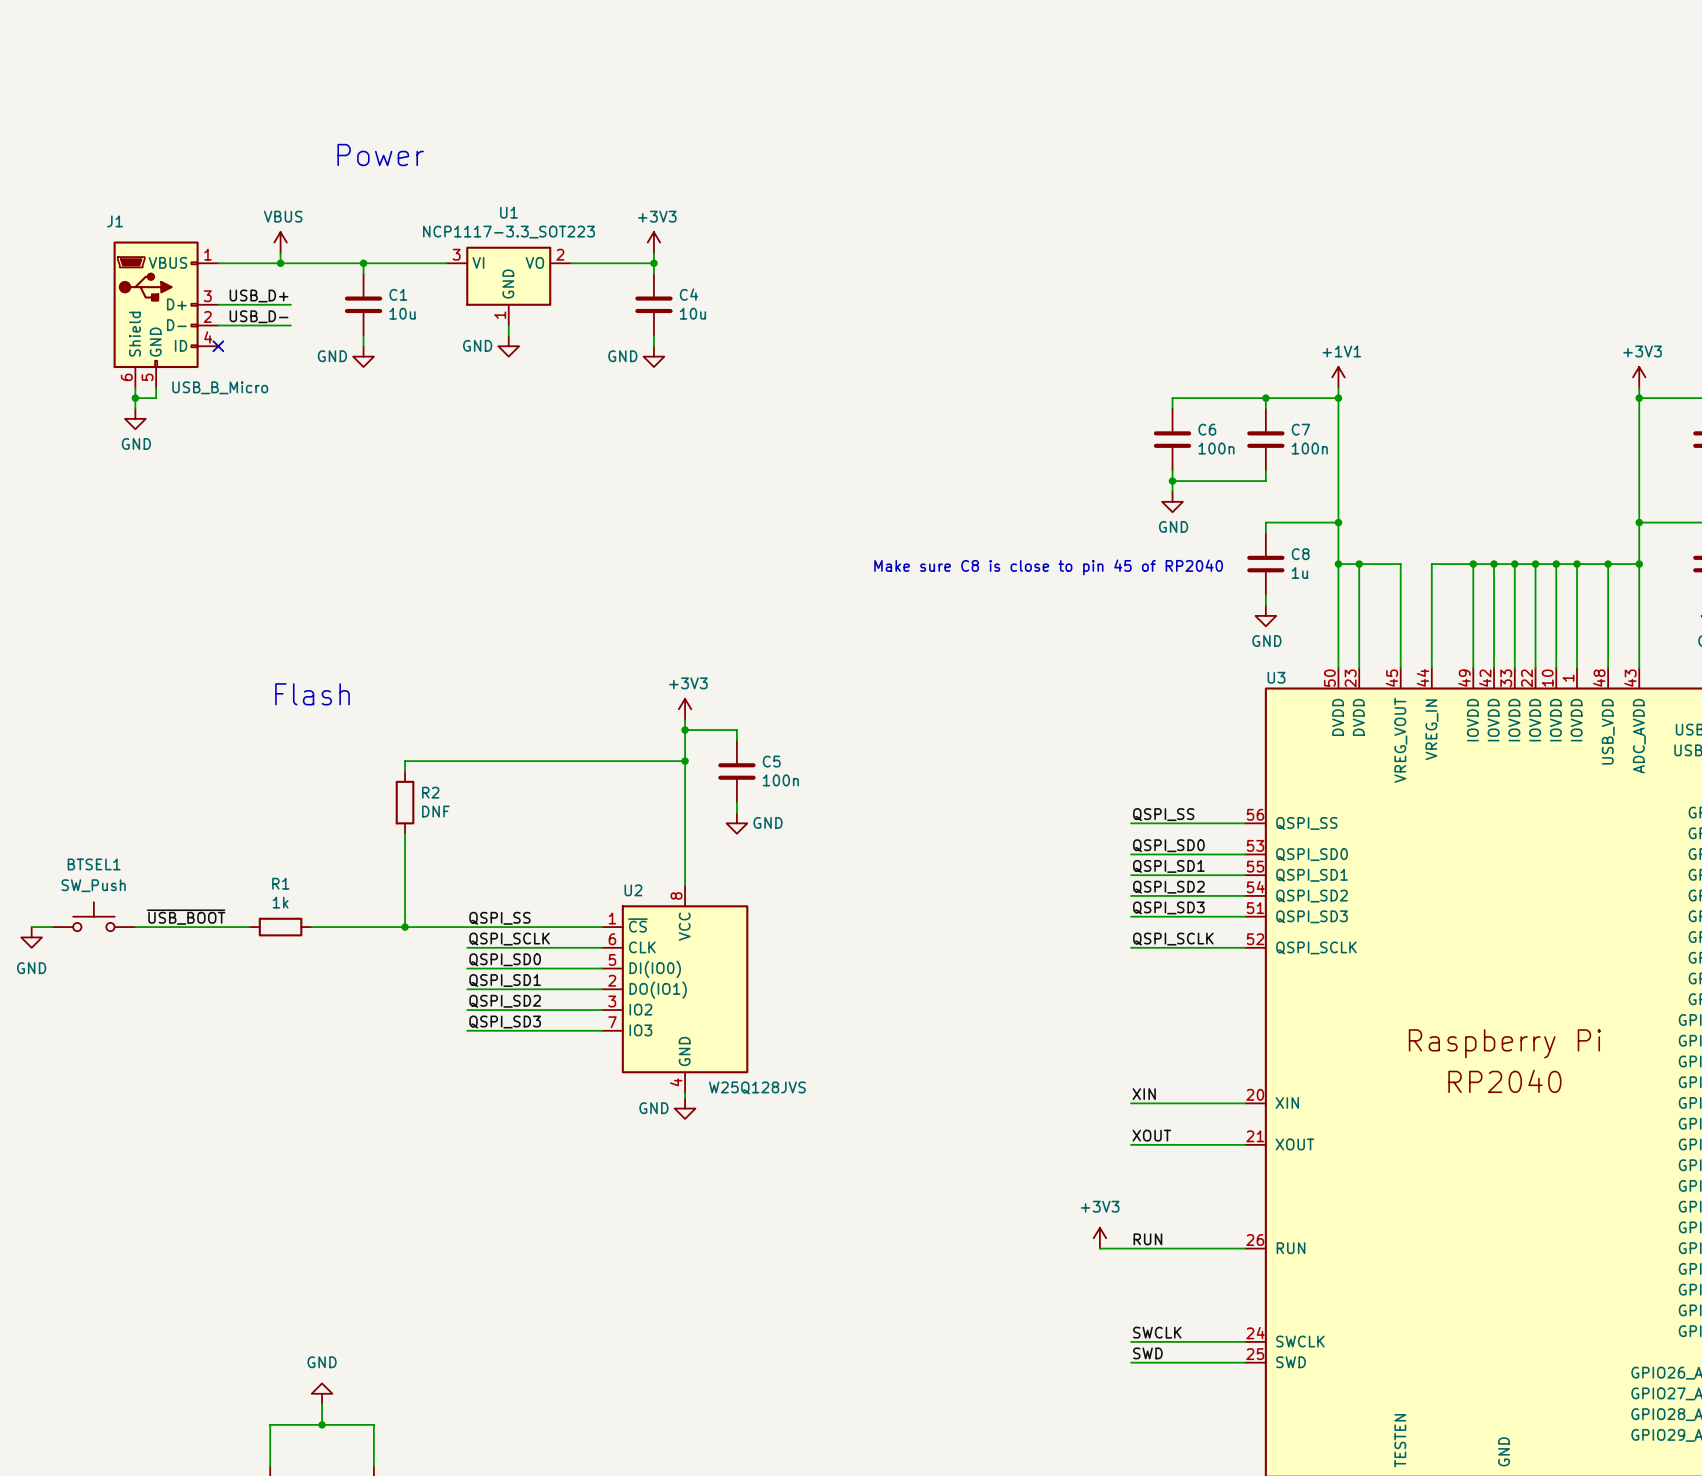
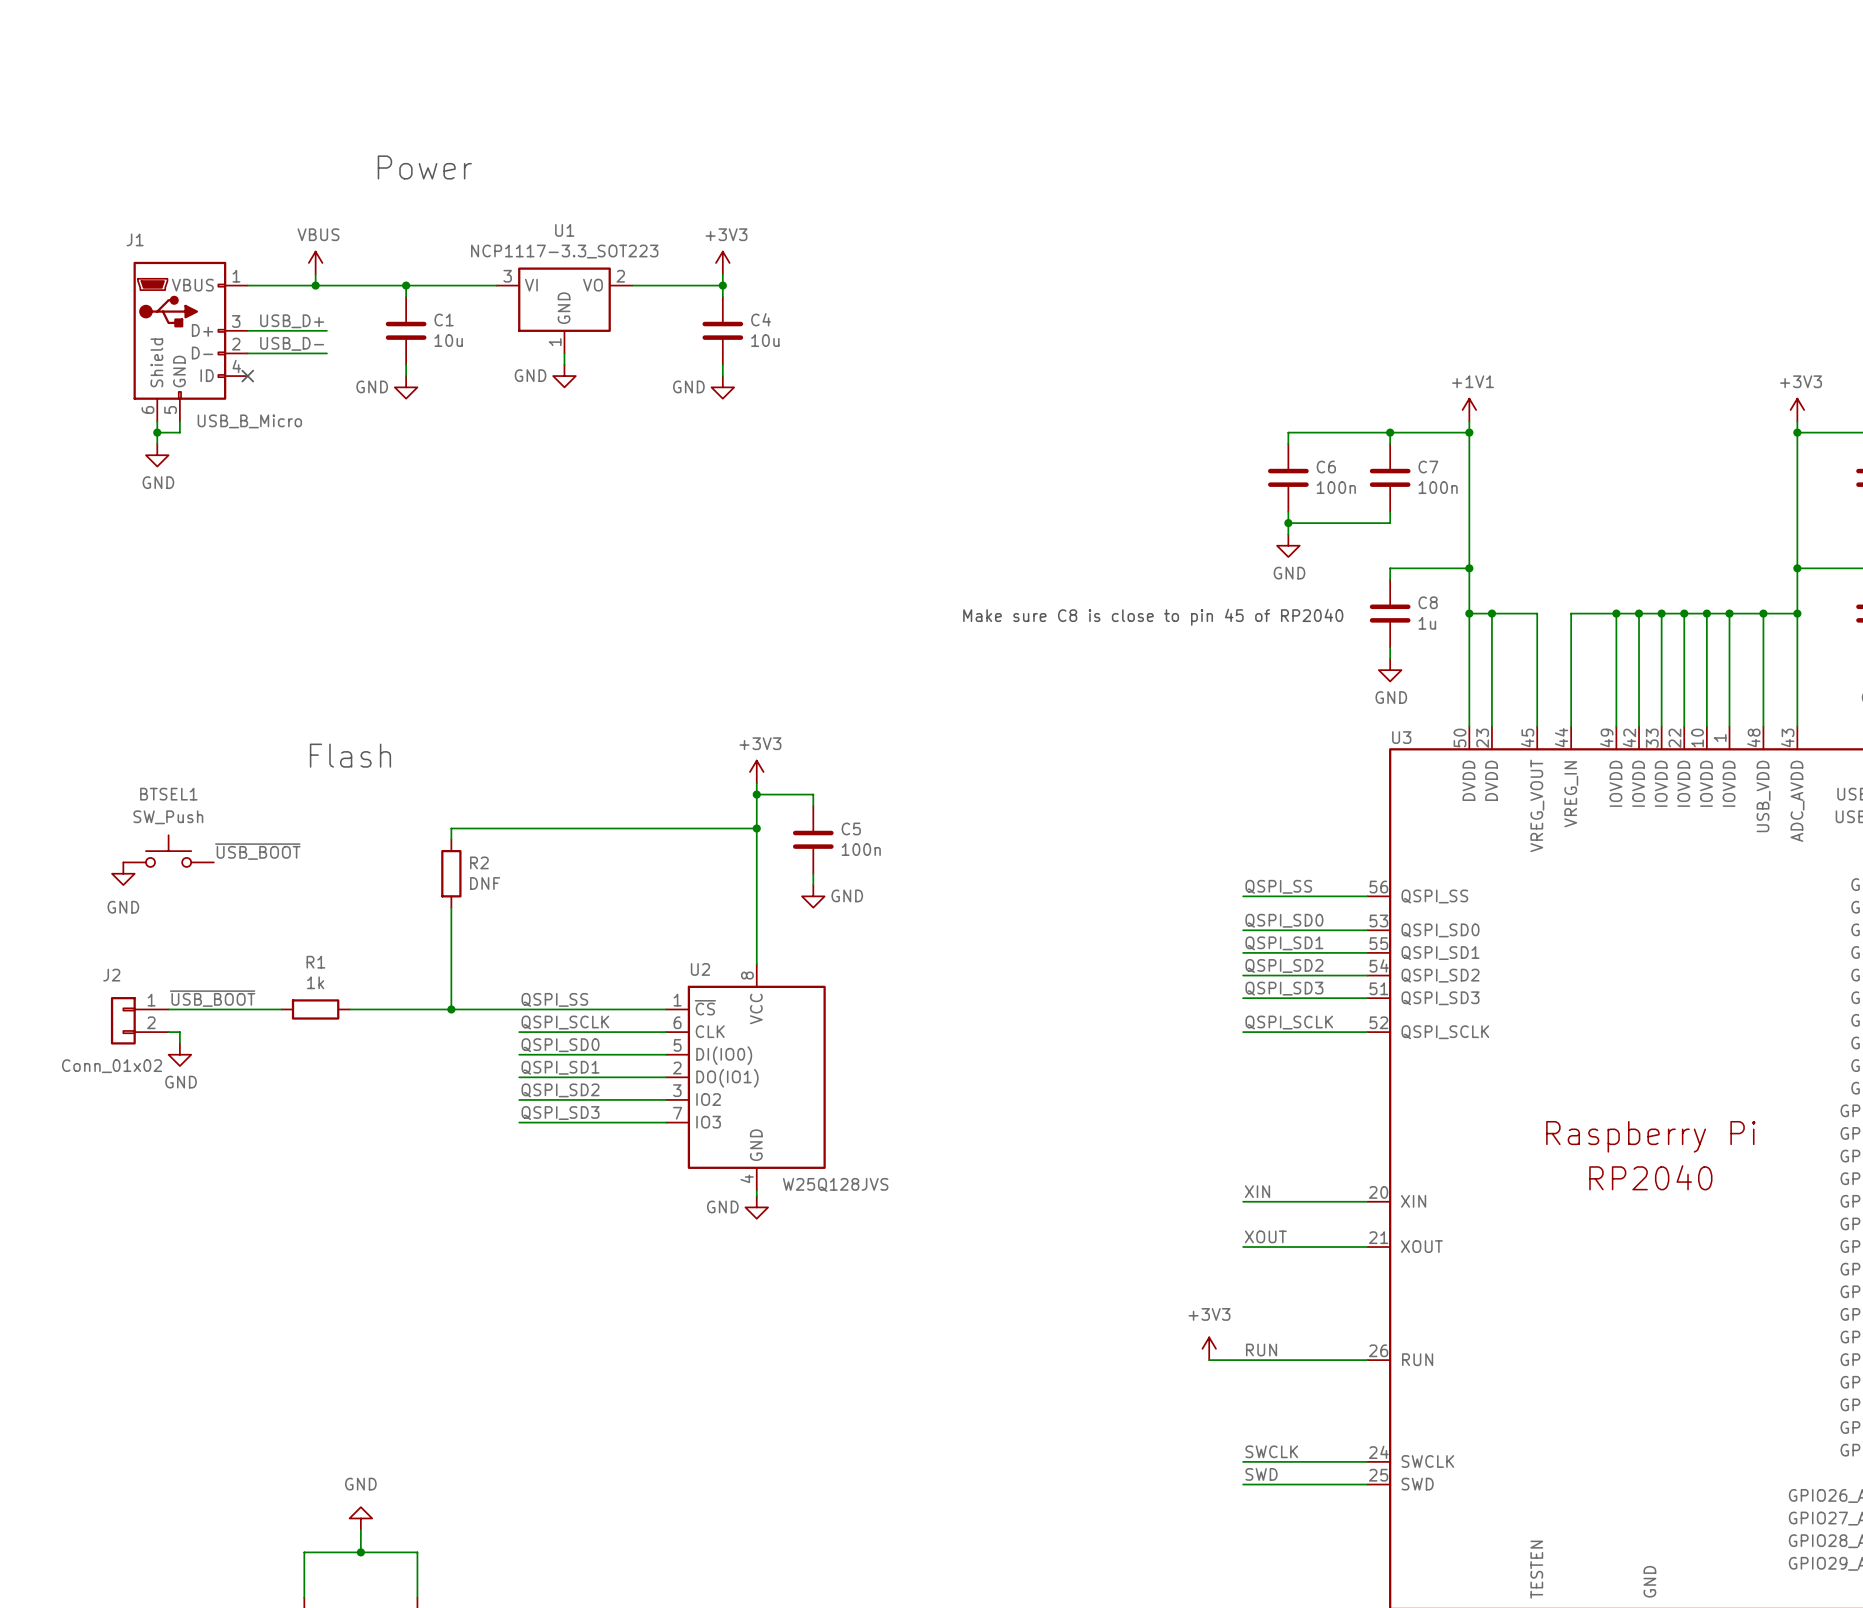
label: none -> ~{USB_BOOT} (257, 851)
power symbol: none -> GND (123, 873)
BTSEL1 position: (93, 916) -> (168, 851)
wire: (31, 927) (52, 927) -> none
power symbol: GND (31, 937) -> none
J2: none -> Conn_01x02 (139, 1020)
wire: none -> (168, 1032) (179, 1032) (179, 1043)
power symbol: none -> GND (179, 1054)

